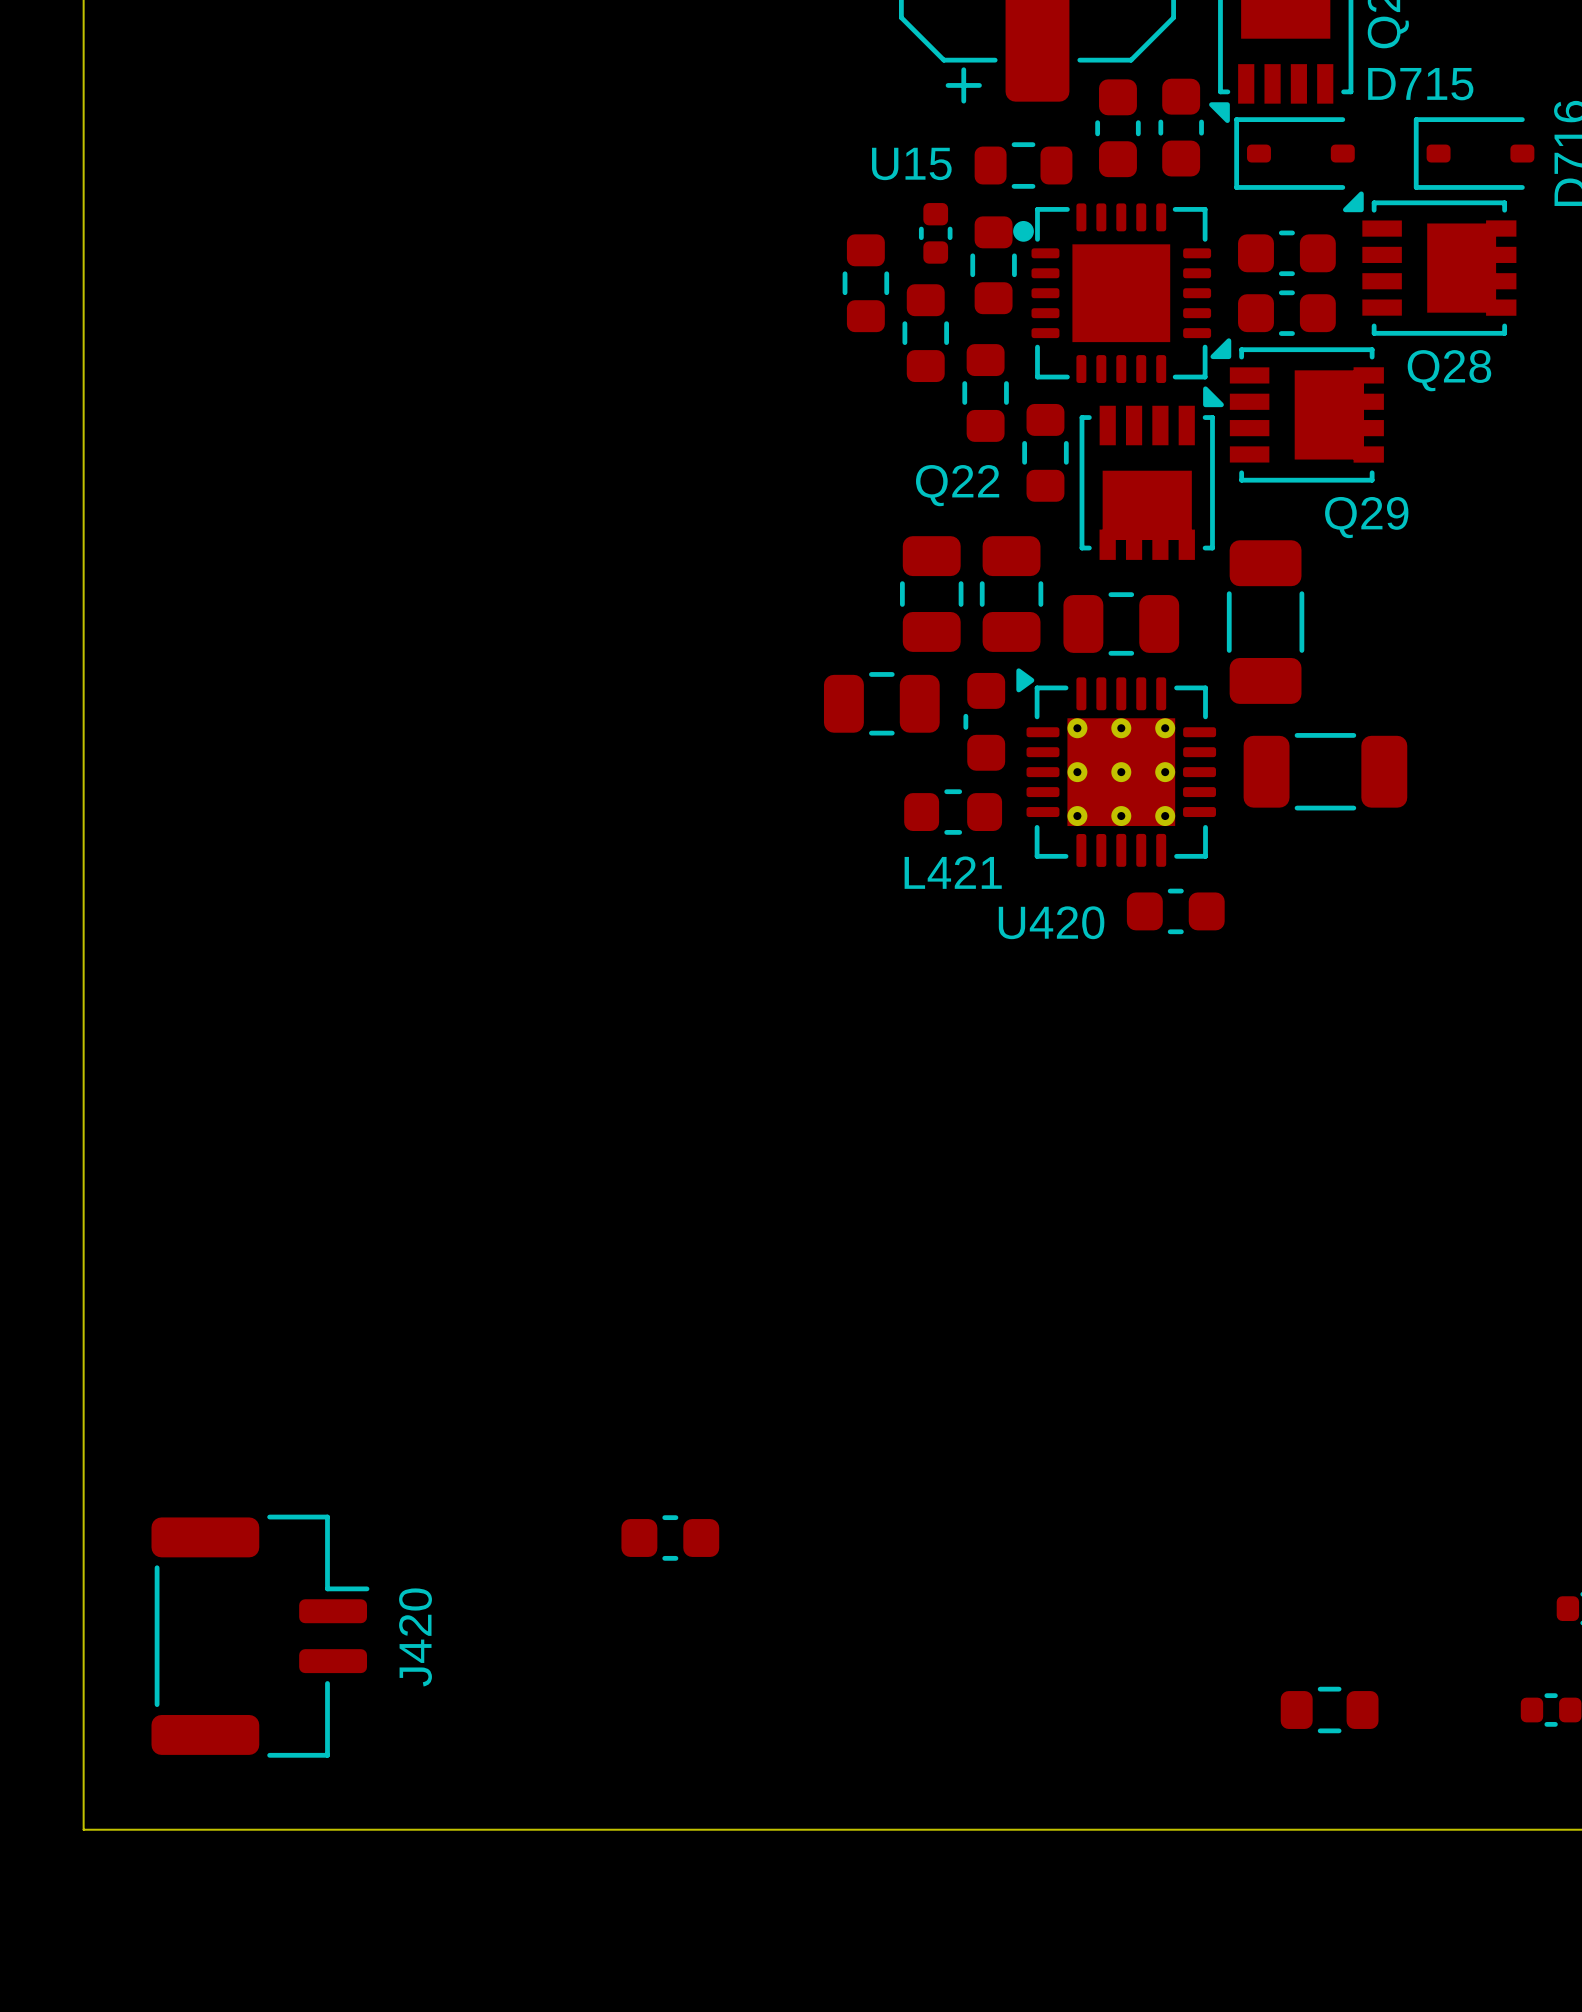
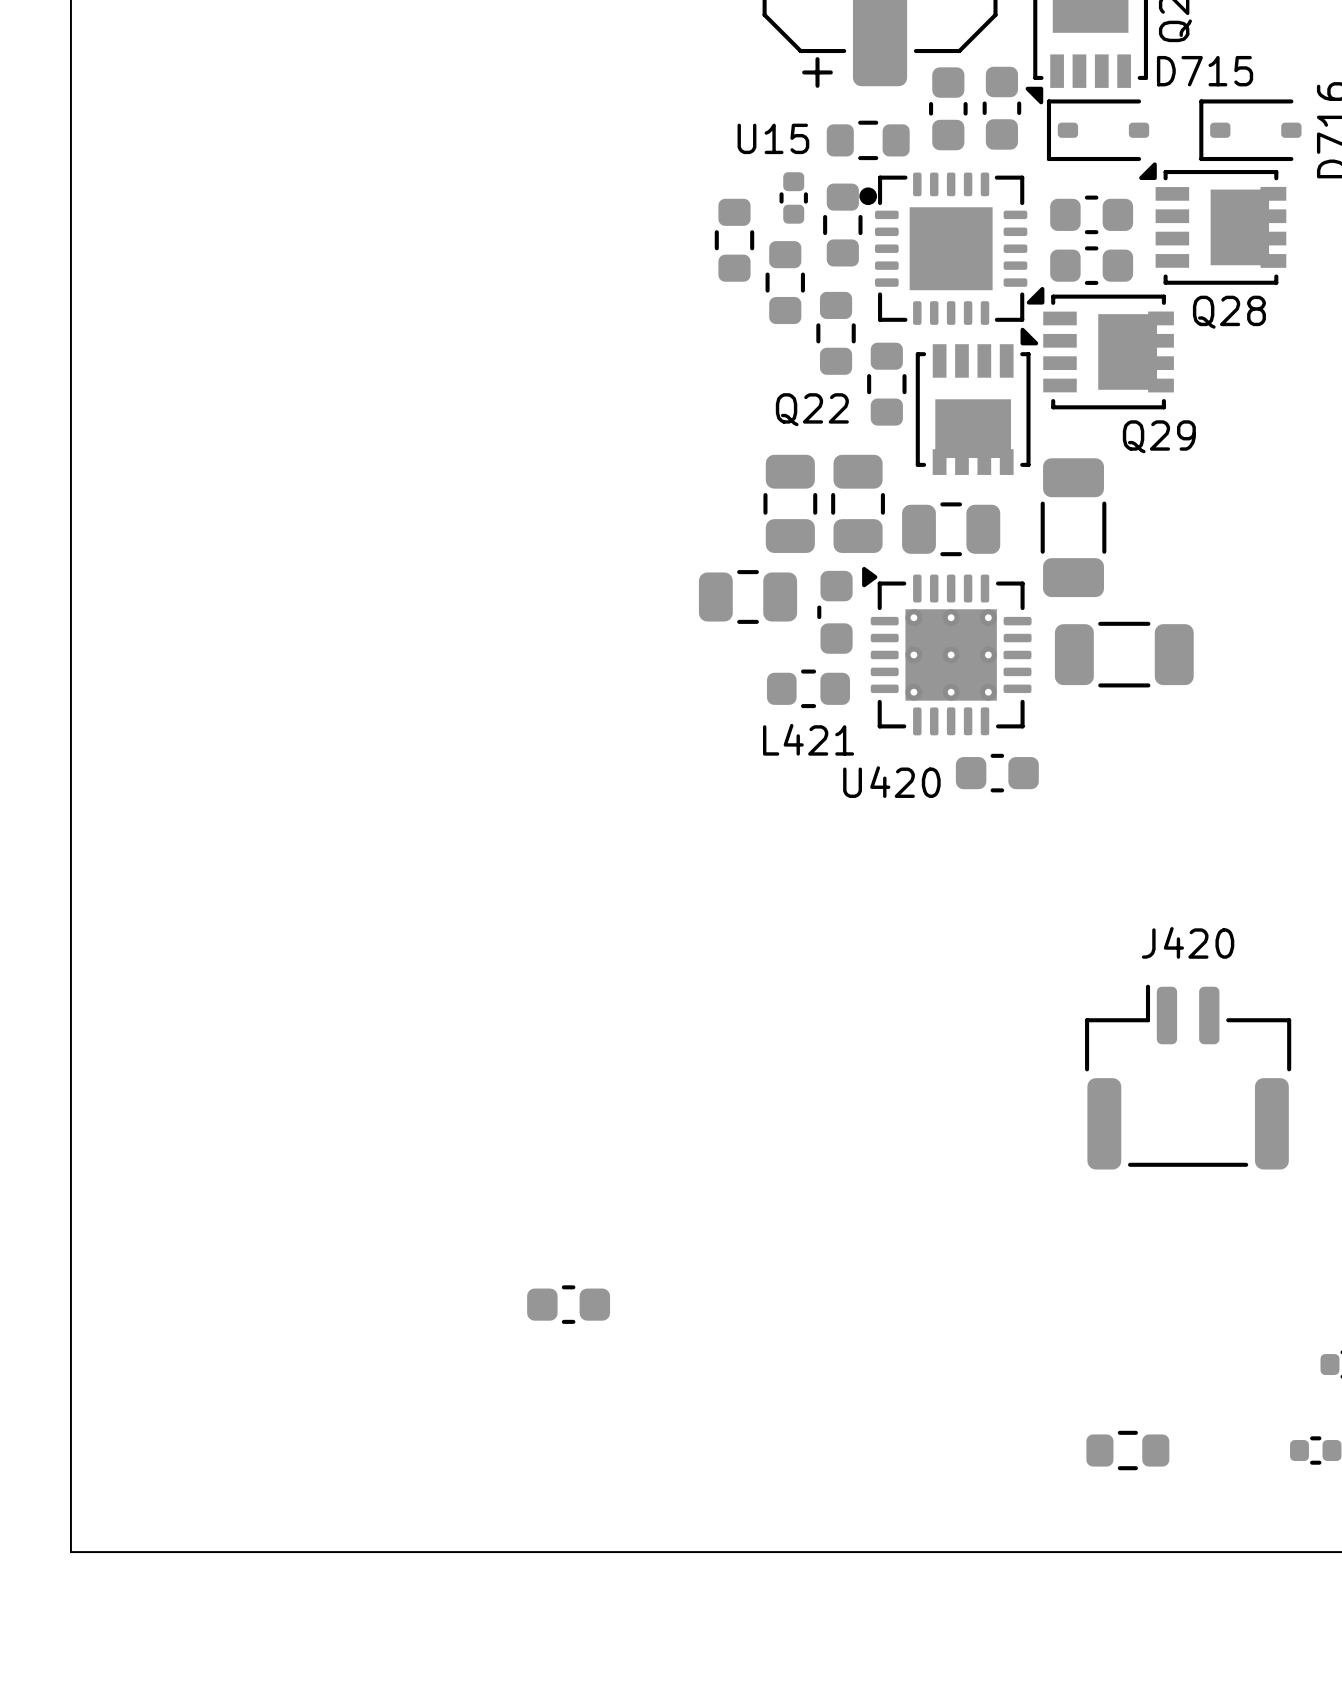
J420 rotation: 0° (260, 1636) -> 90° counterclockwise (1188, 1077)
J420 position: (260, 1636) -> (1188, 1077)

